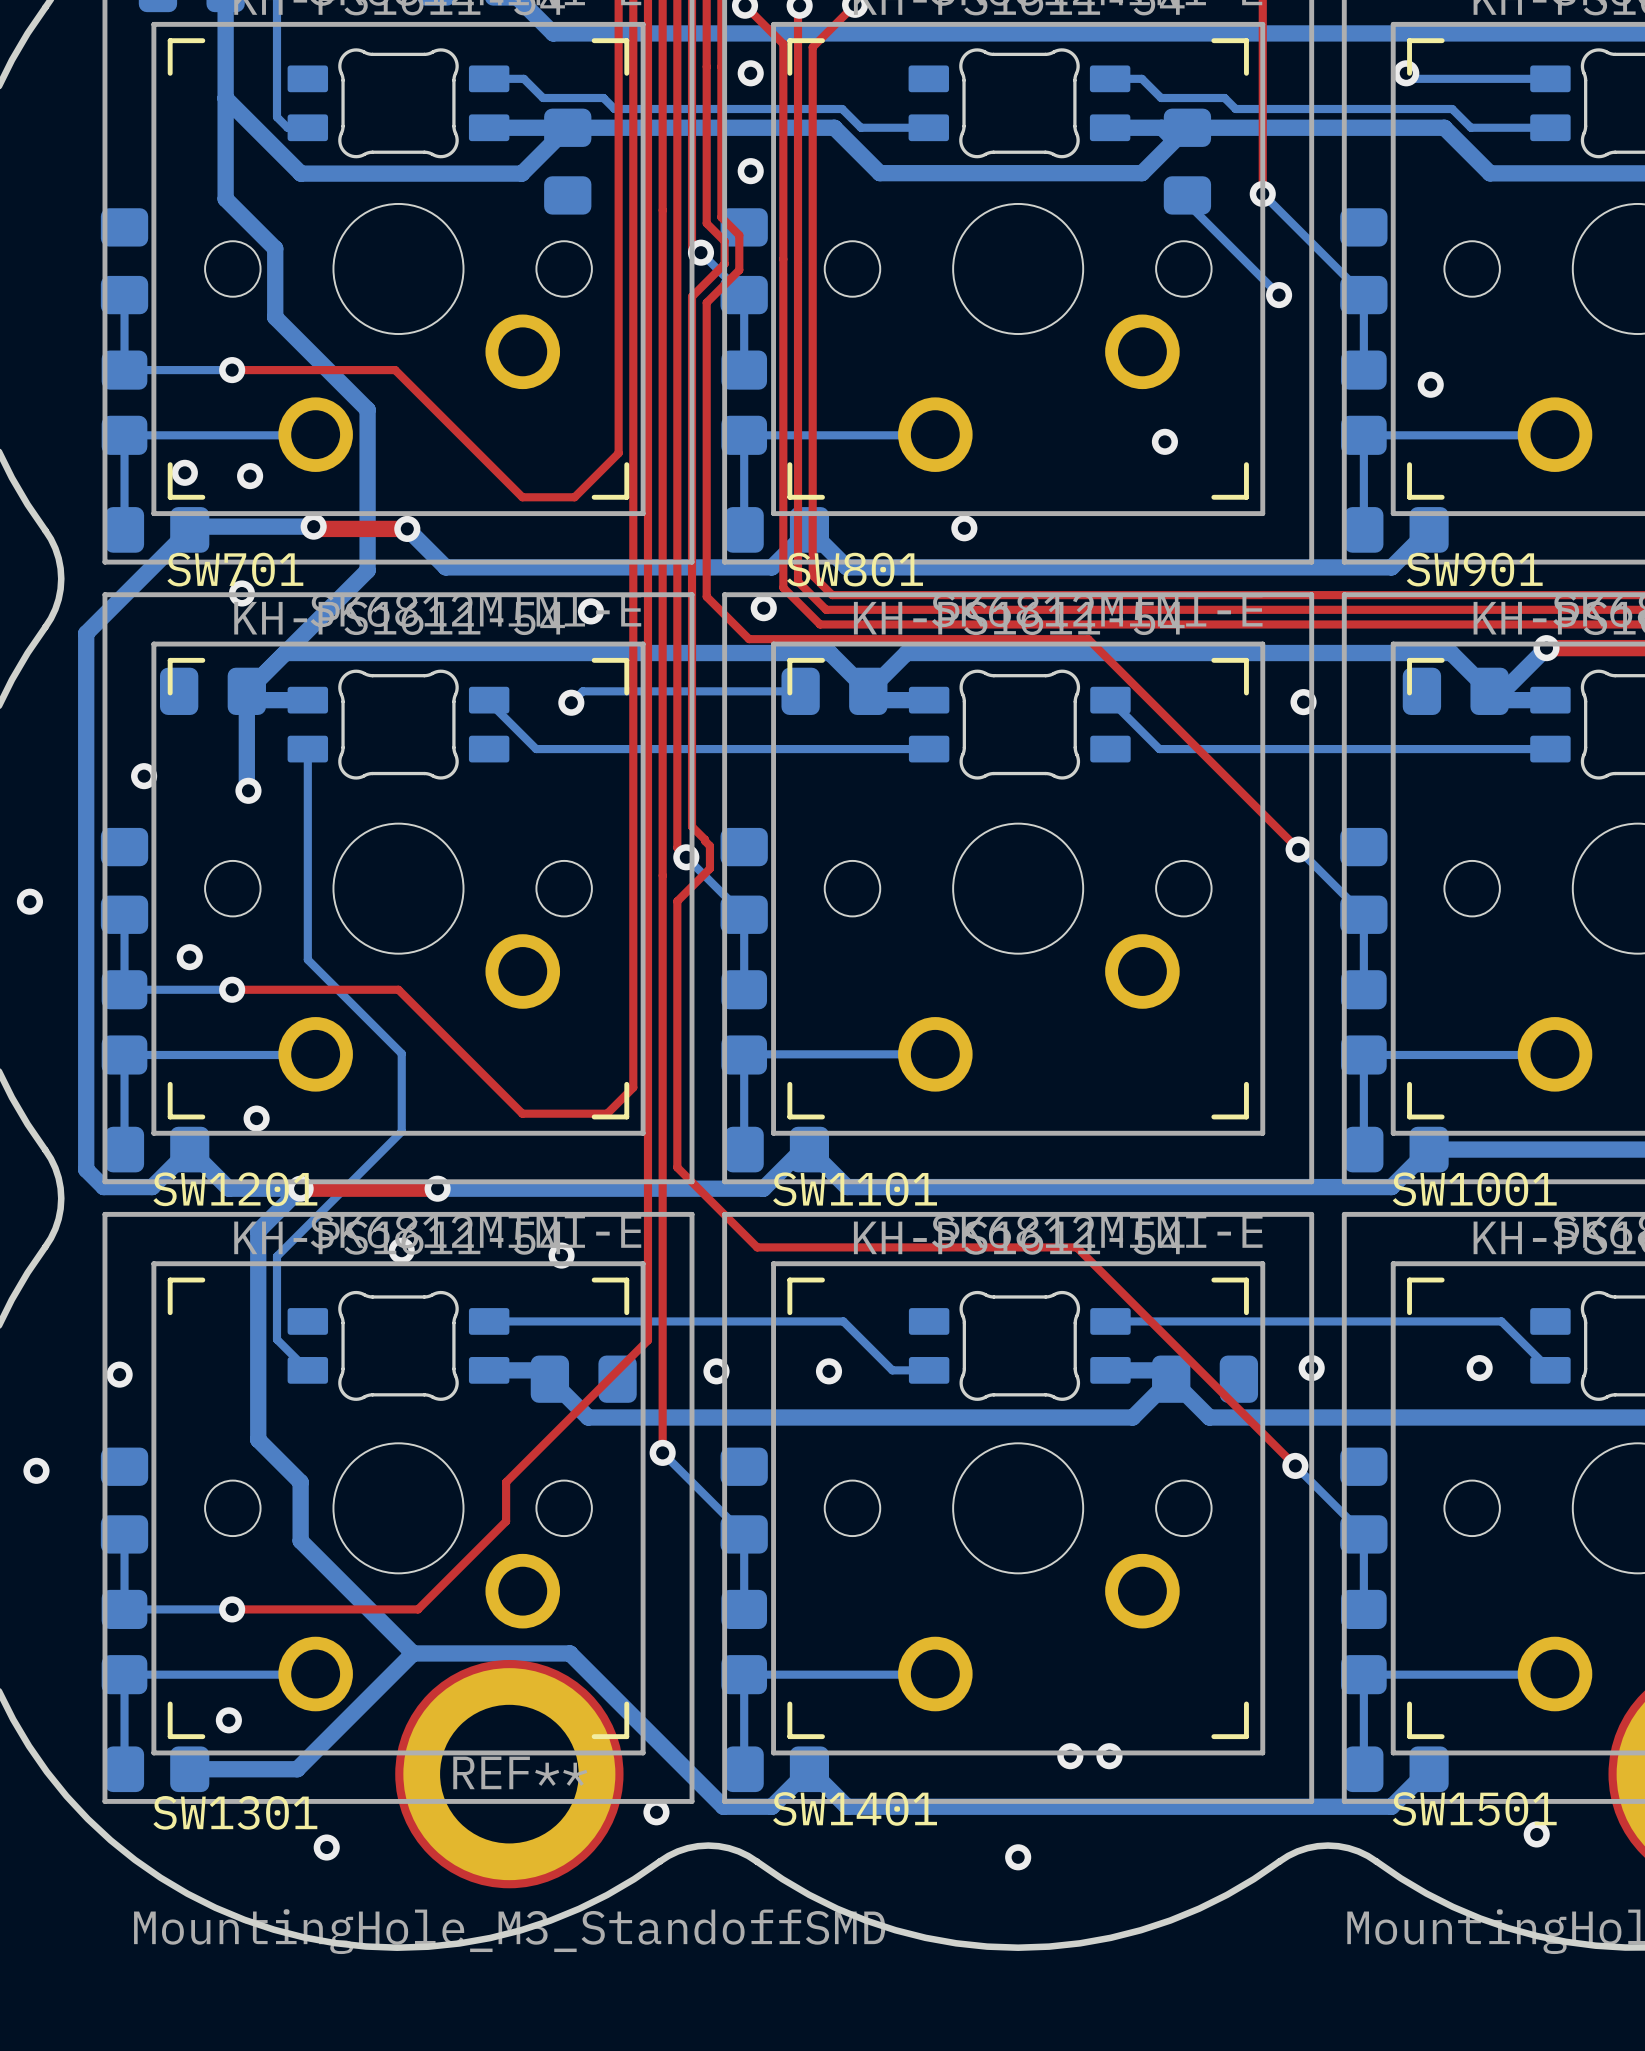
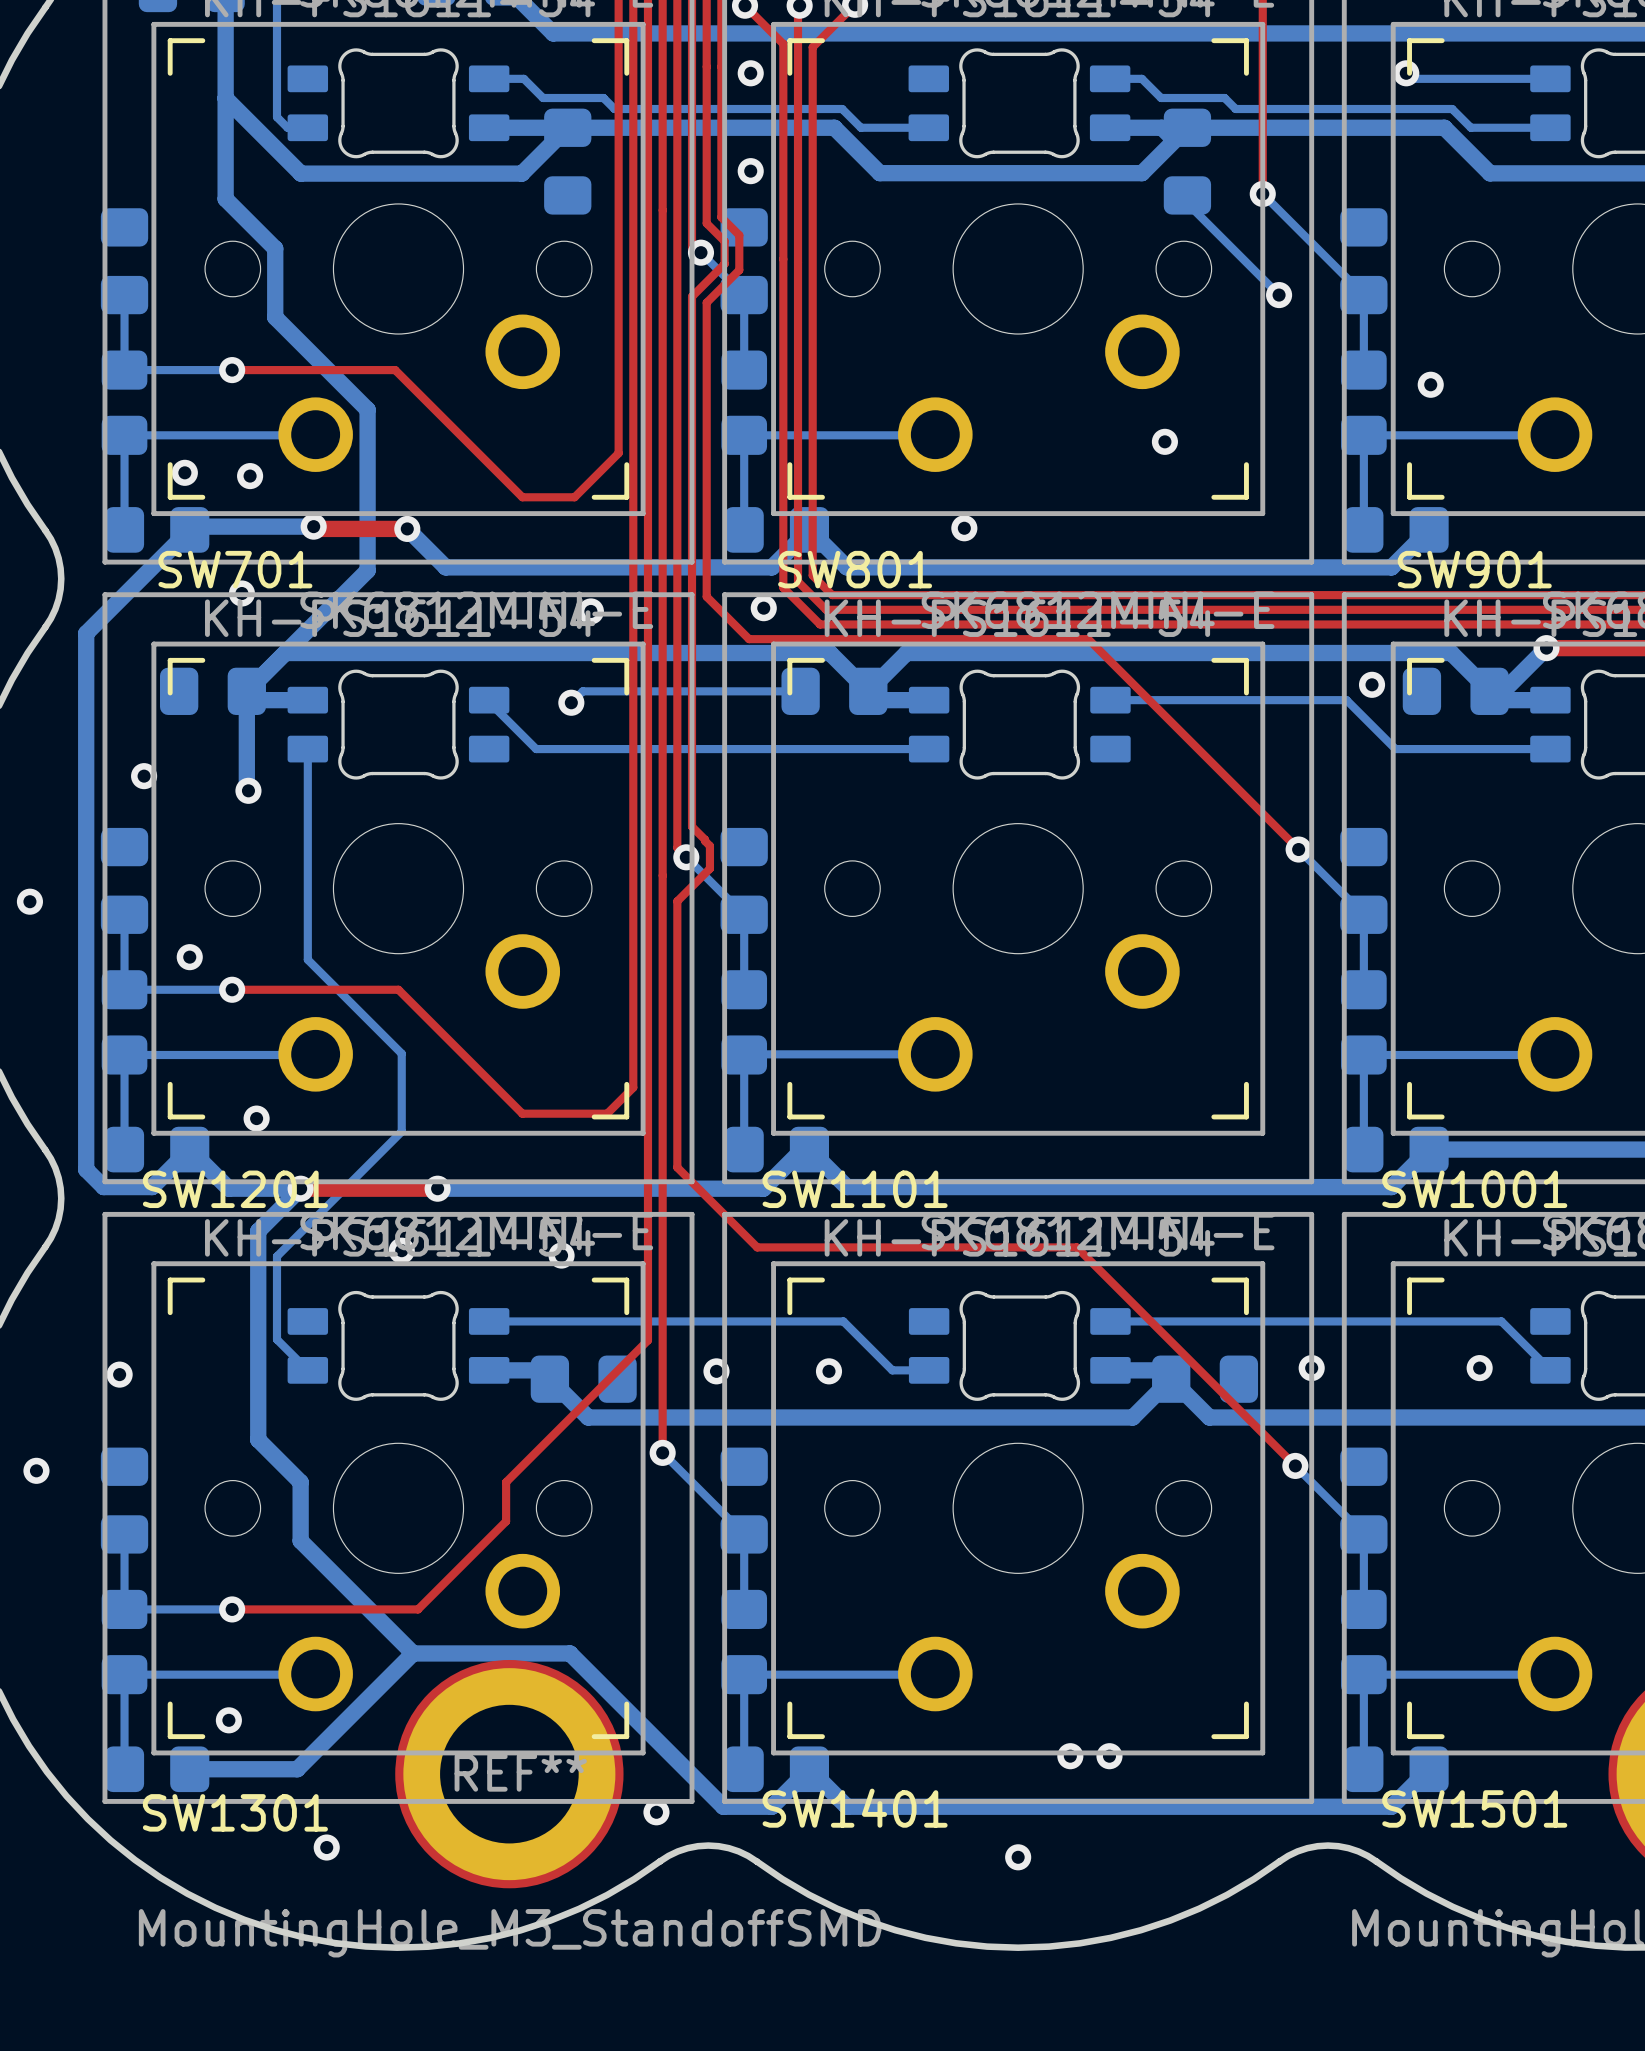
bottom track: (1110, 700) (1159, 749) (1395, 749) -> (1104, 700) (1346, 700) (1395, 749)
via position: (1303, 702) -> (1372, 684)
via: (1536, 1834) -> none

